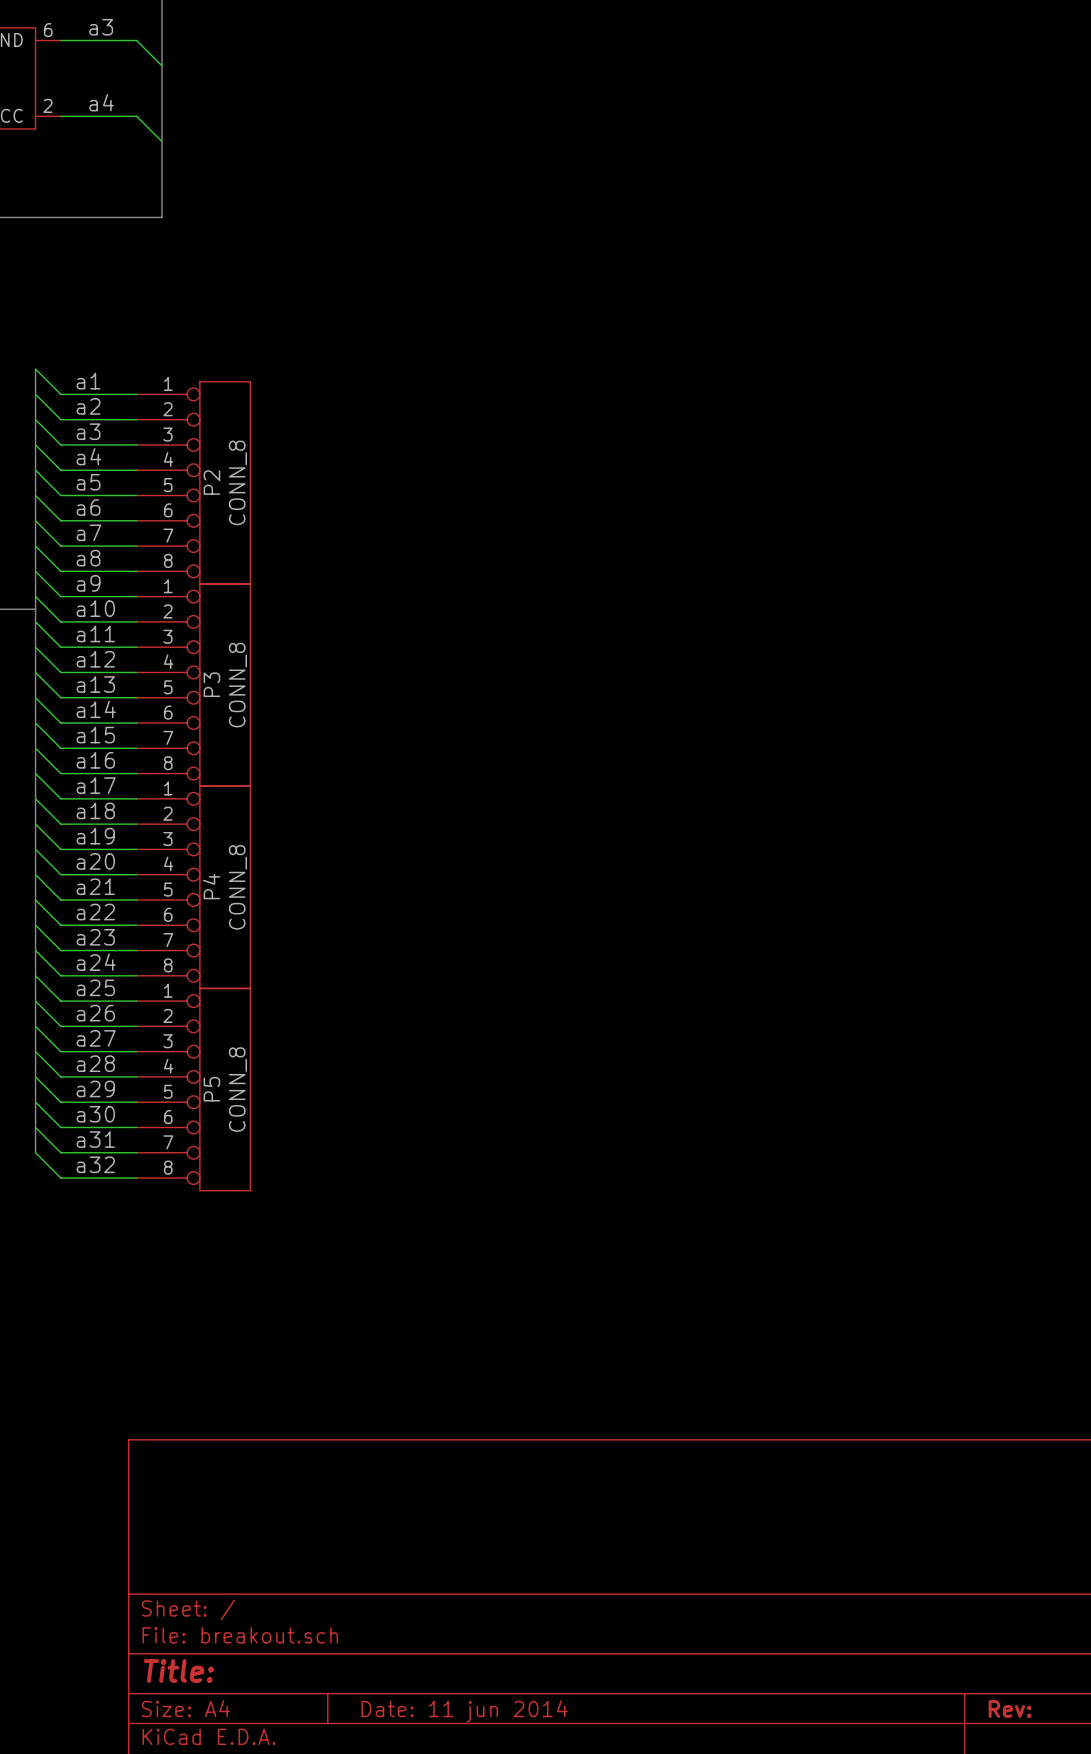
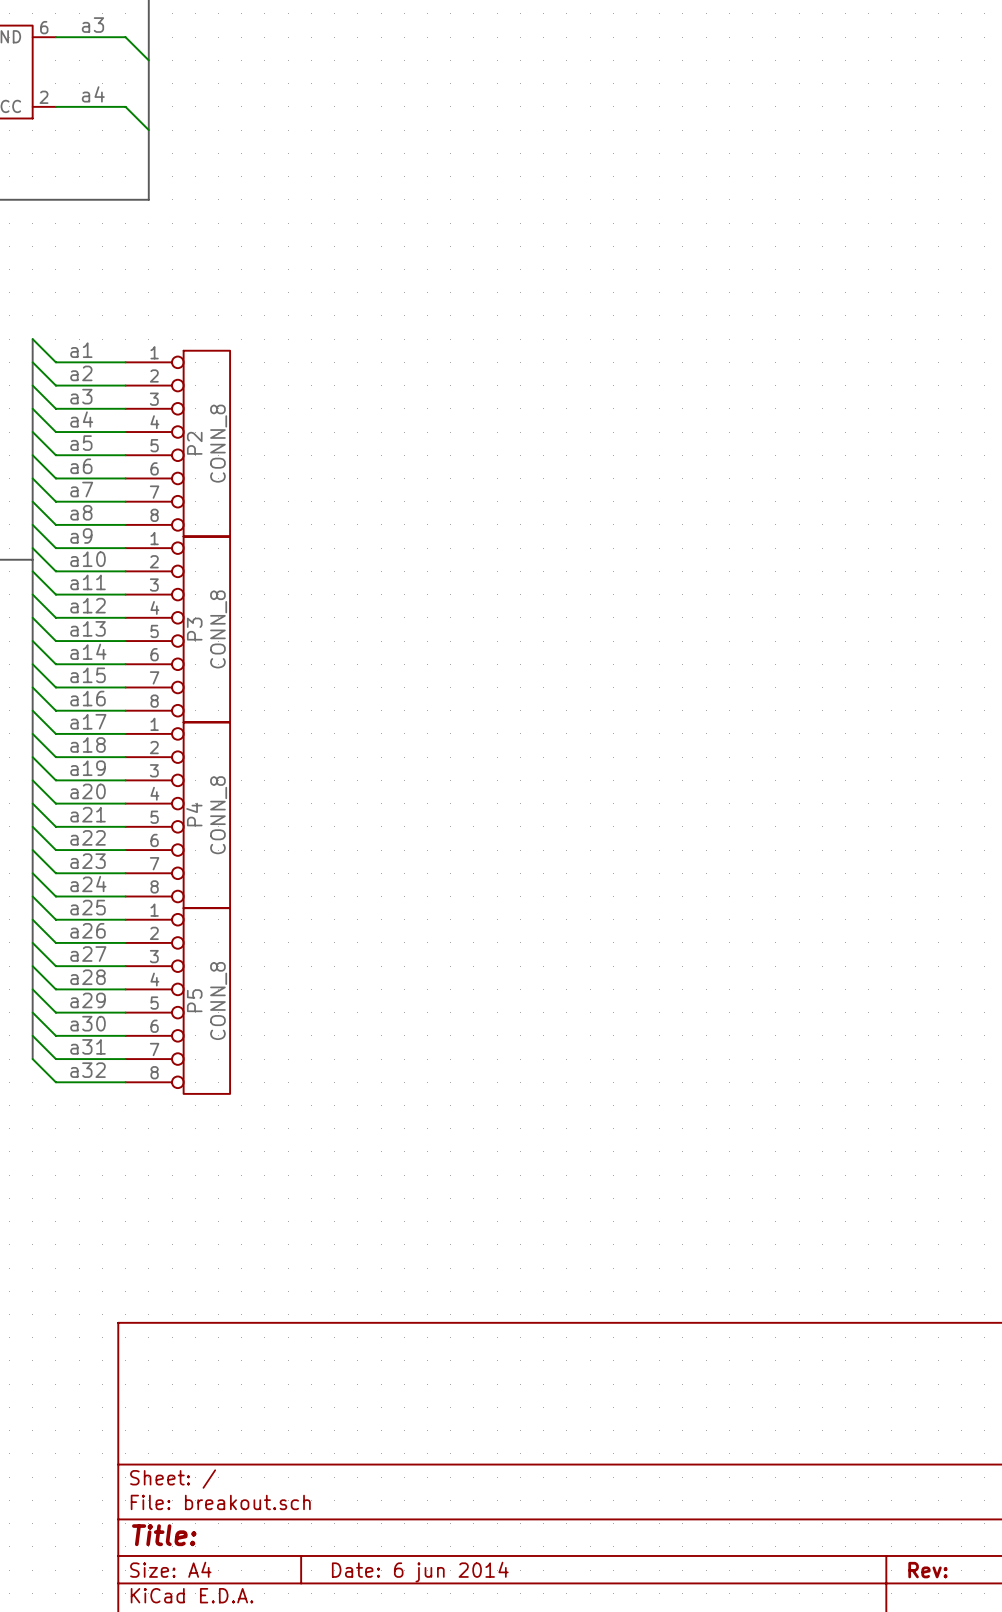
title block: Date: 11 jun 2014 (464, 1711) -> Date: 6 jun 2014 (420, 1572)

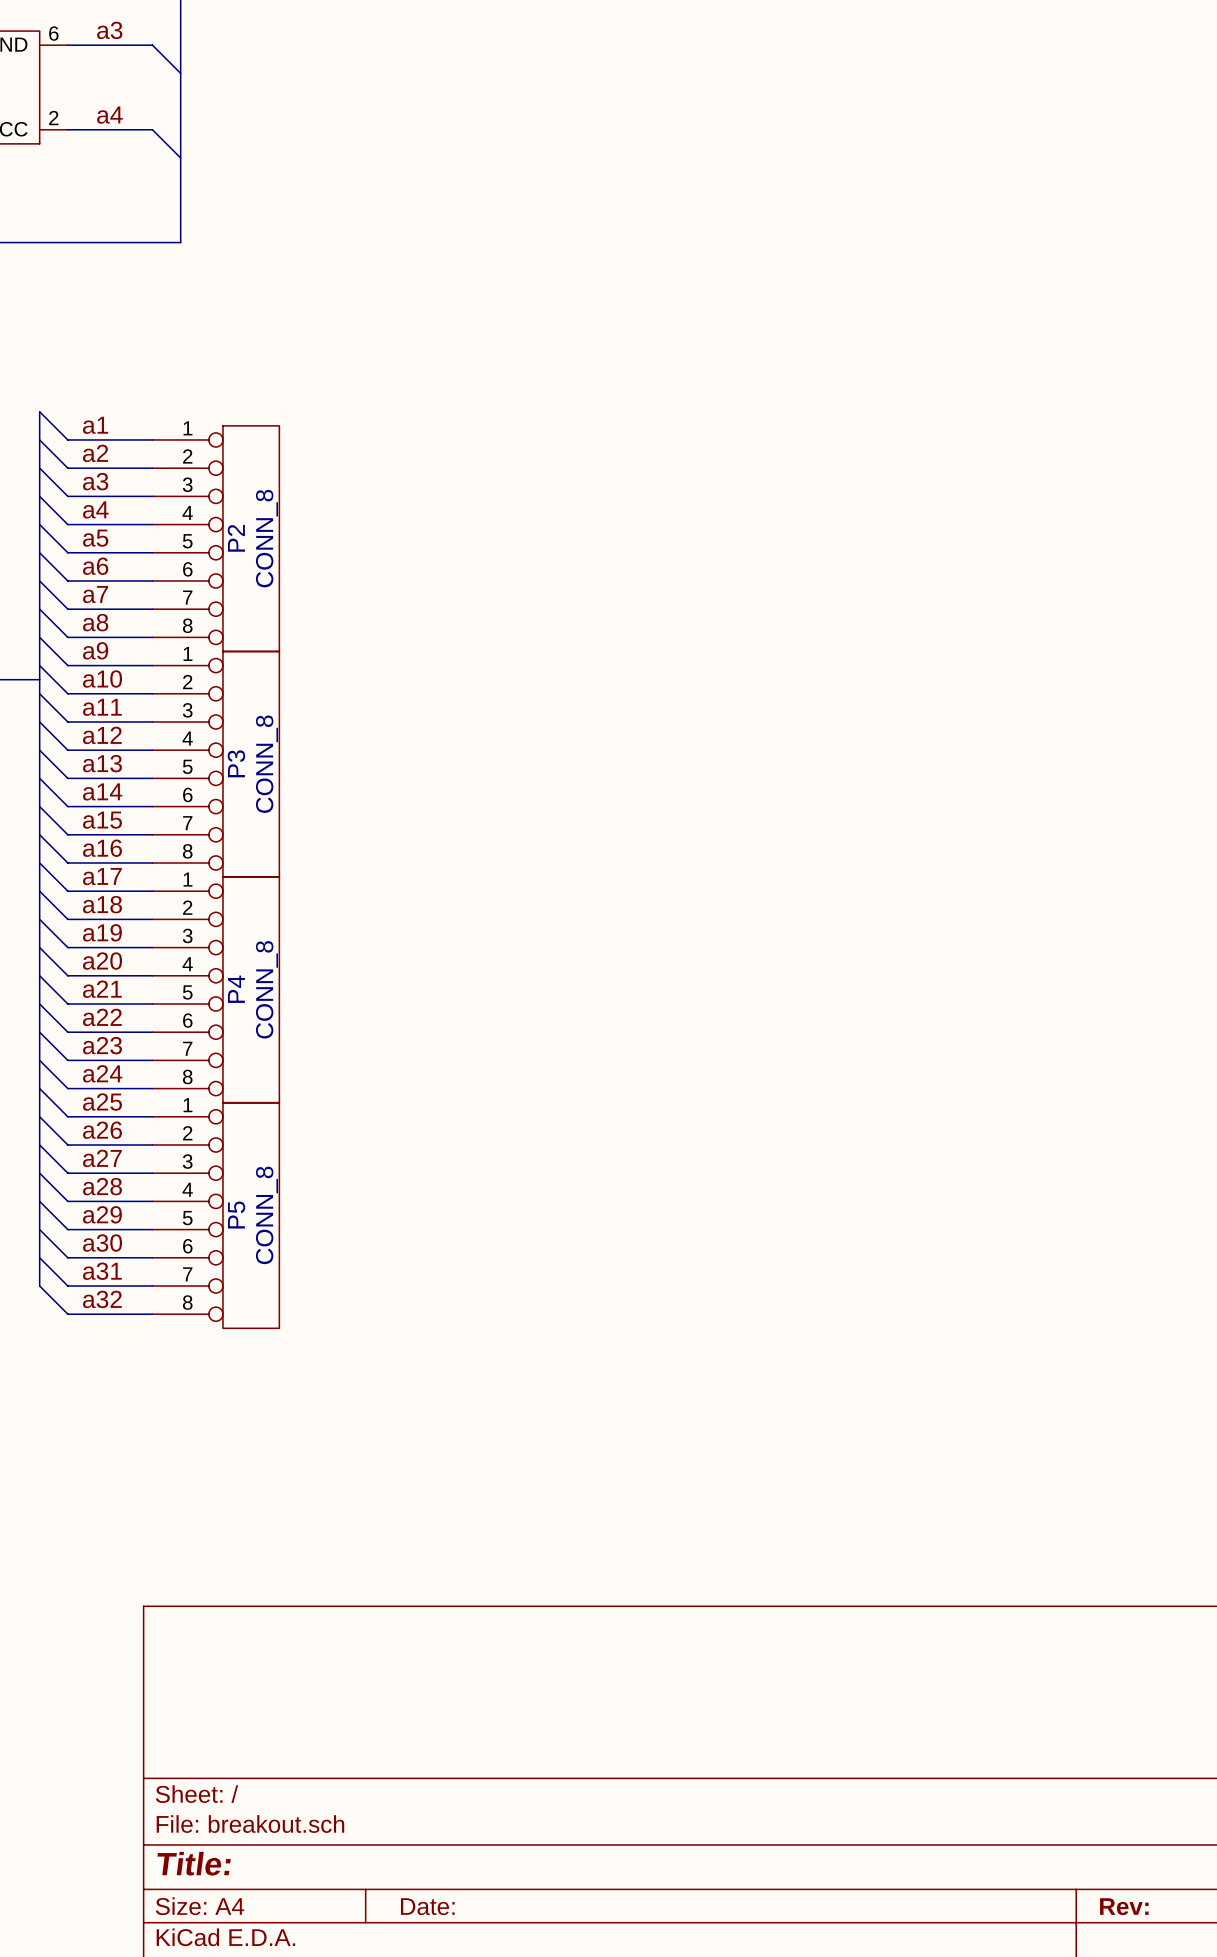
title block: Date: 6 jun 2014 (420, 1572) -> Date: (427, 1906)

